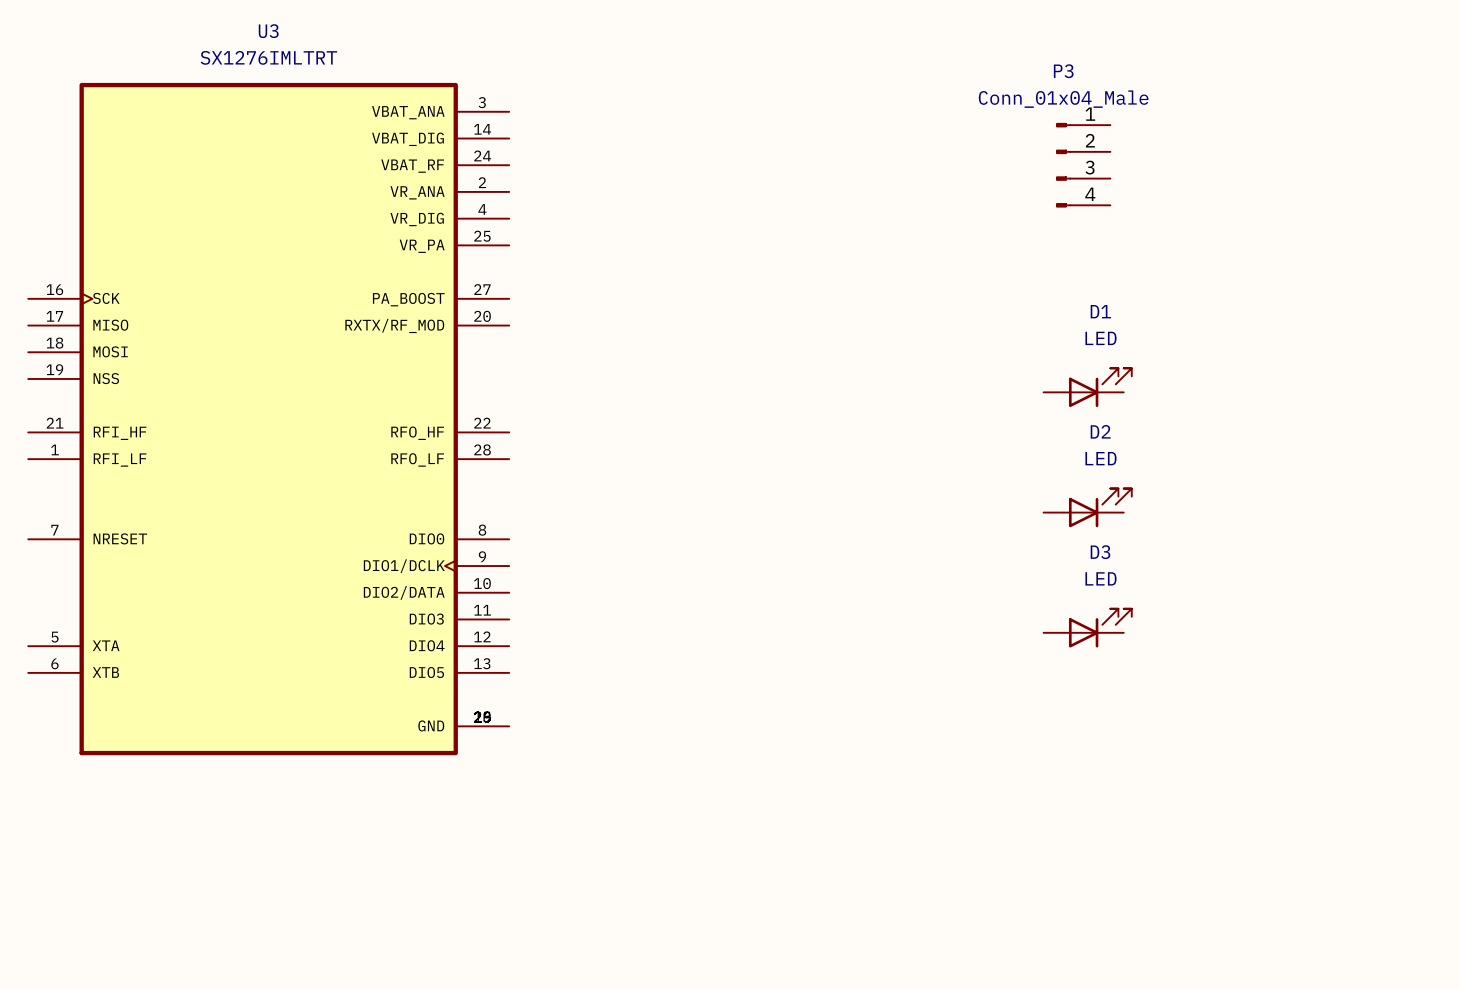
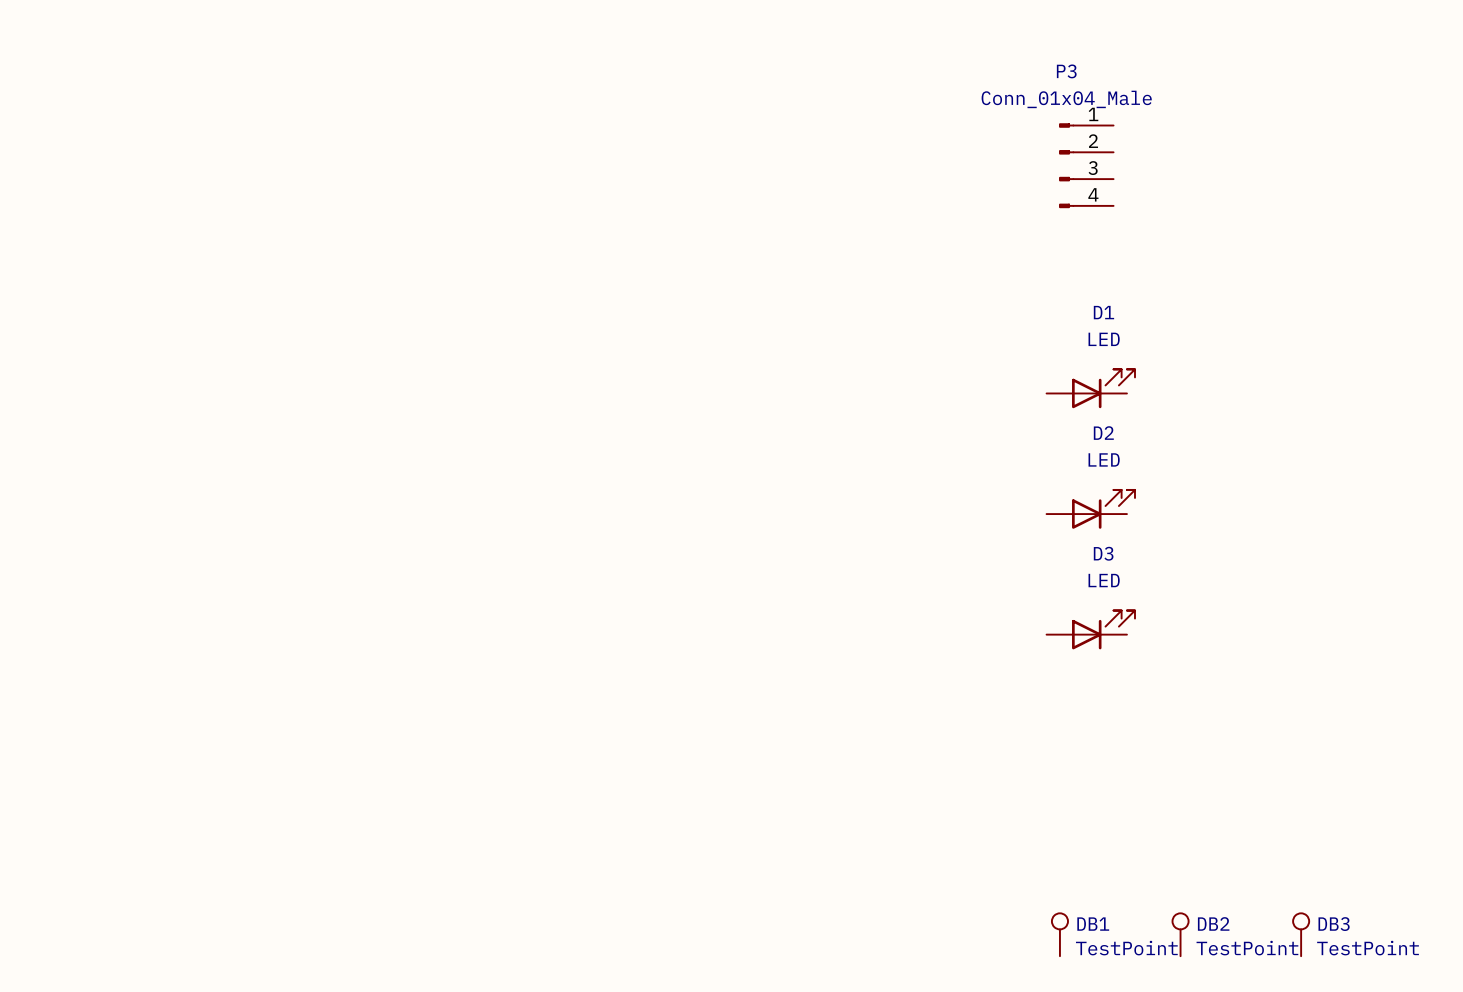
U3: SX1276IMLTRT (268, 419) -> none
DB1: none -> TestPoint (1059, 934)
DB2: none -> TestPoint (1180, 934)
DB3: none -> TestPoint (1301, 934)

